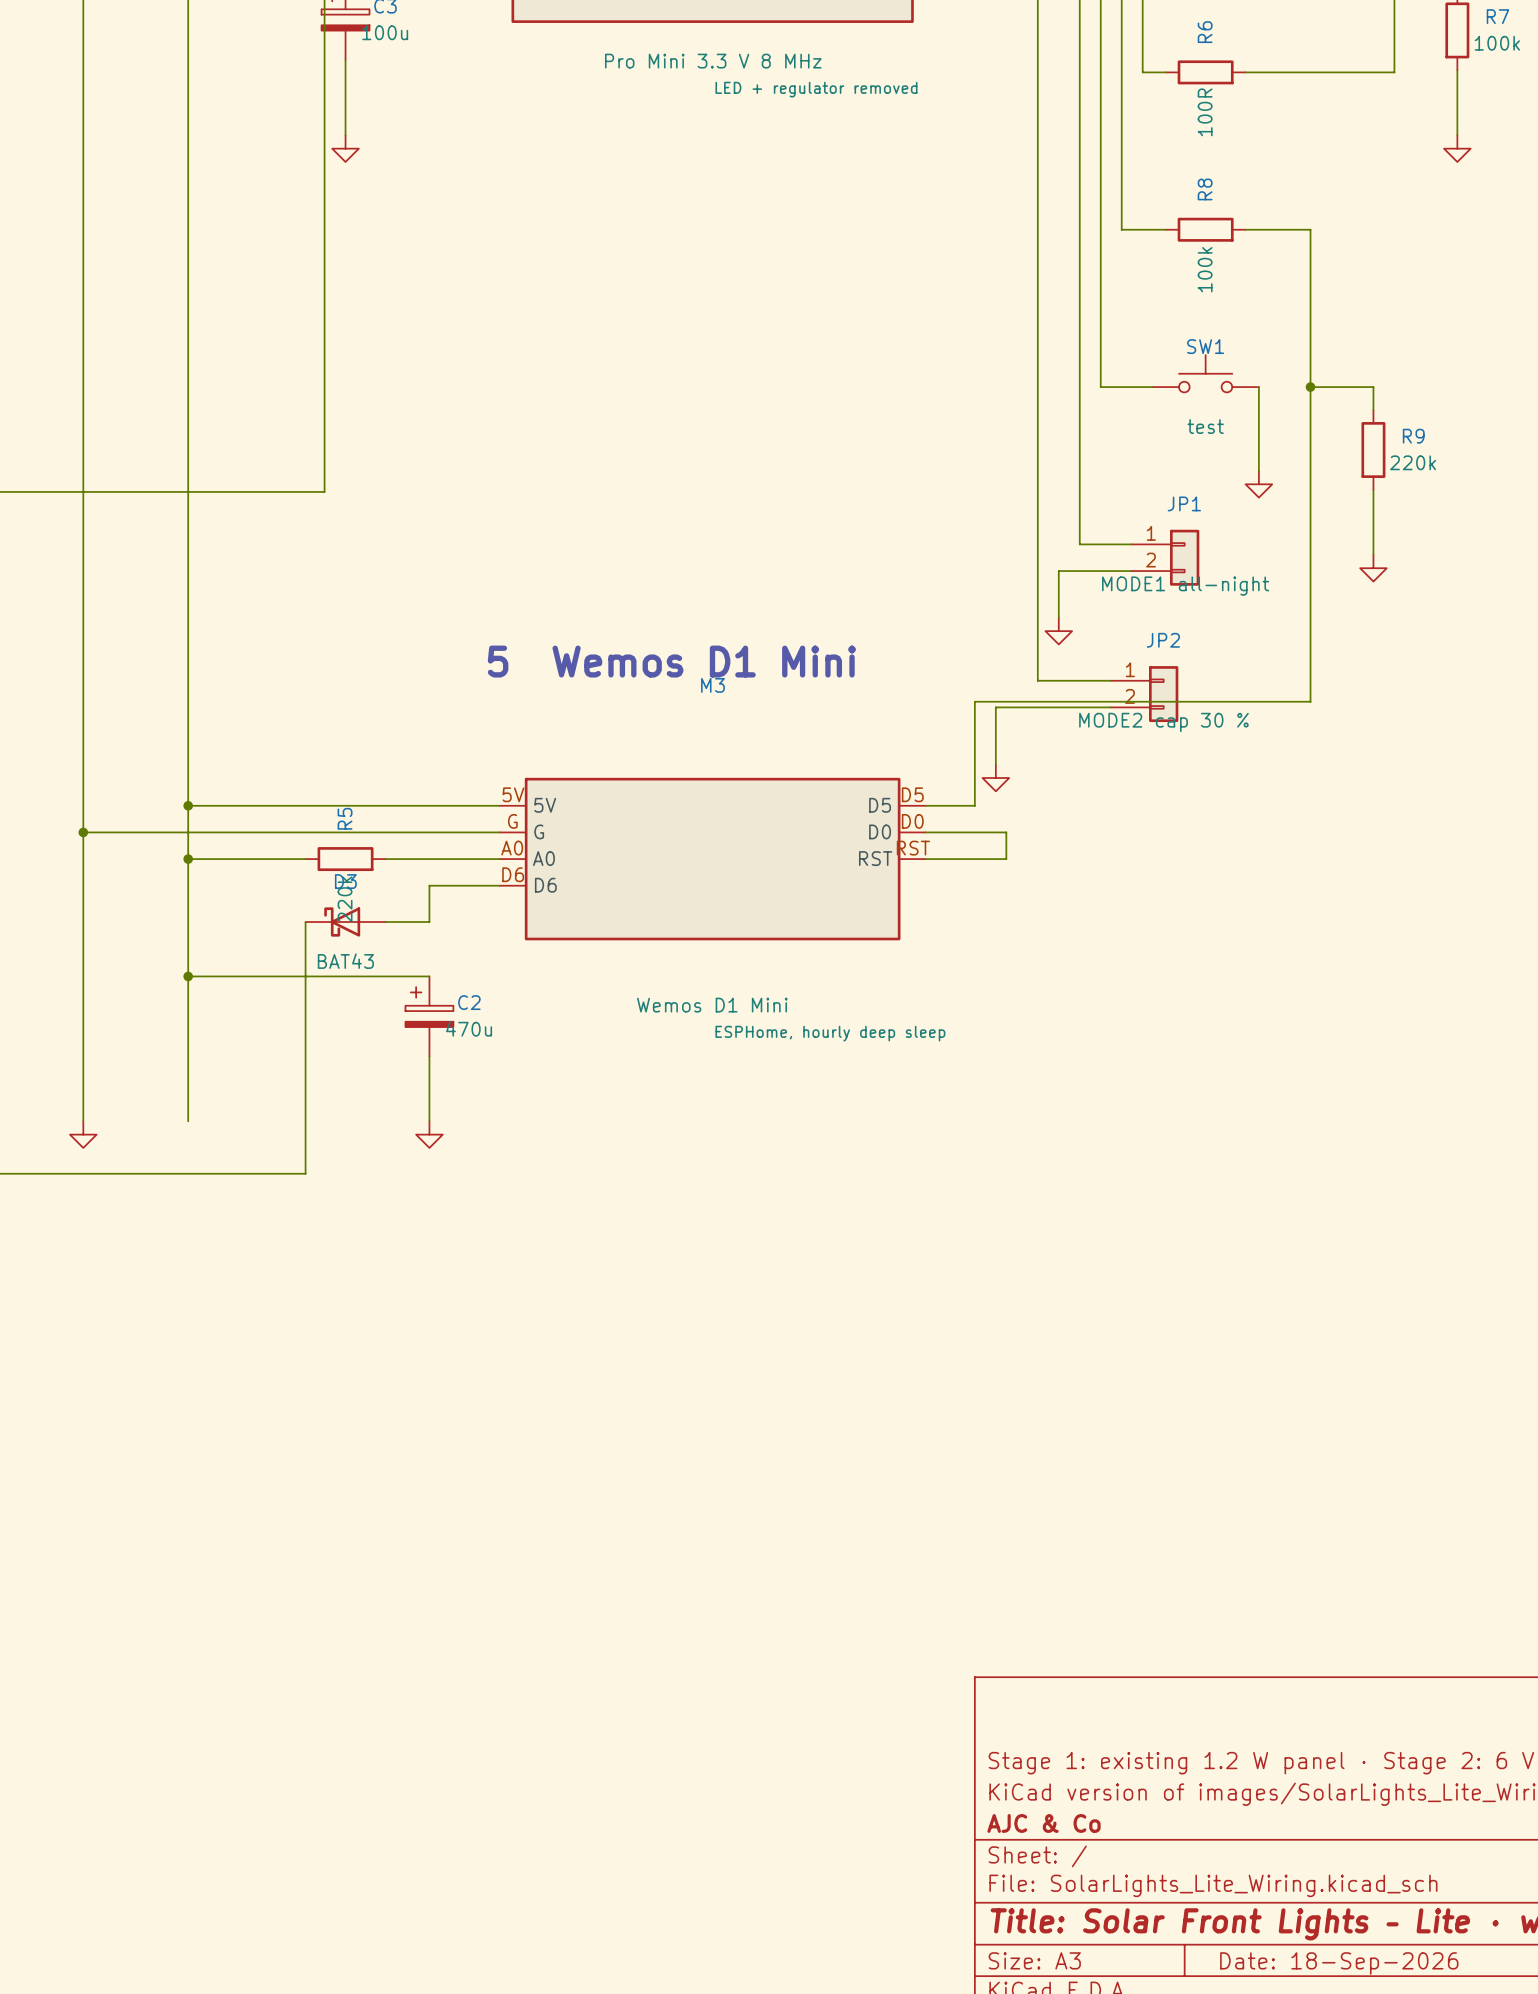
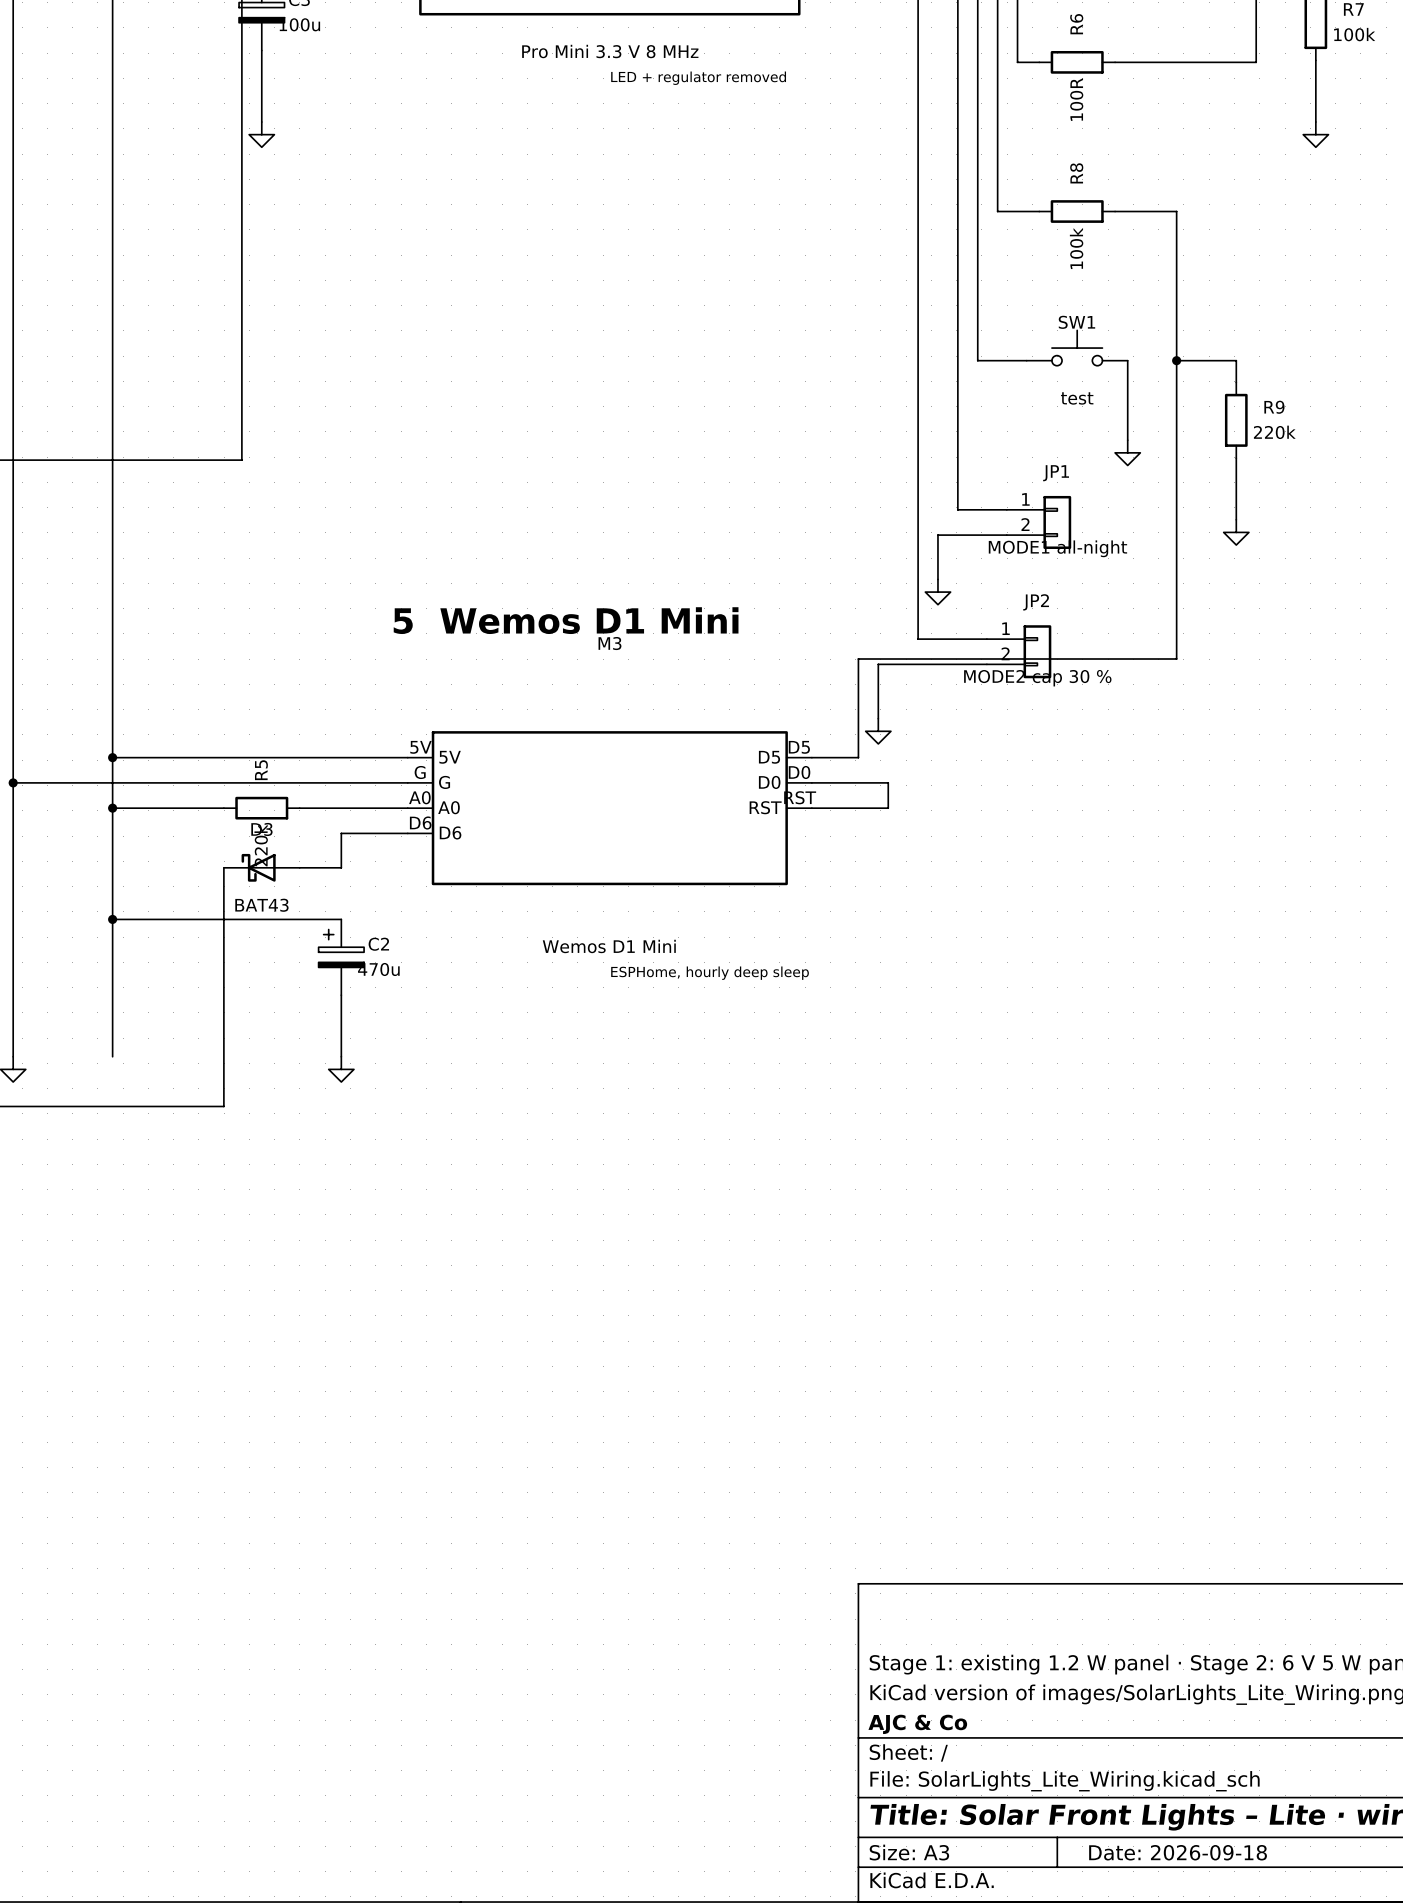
title block: Date: 18-Sep-2026 (1339, 1963) -> Date: 2026-09-18 (1178, 1852)

